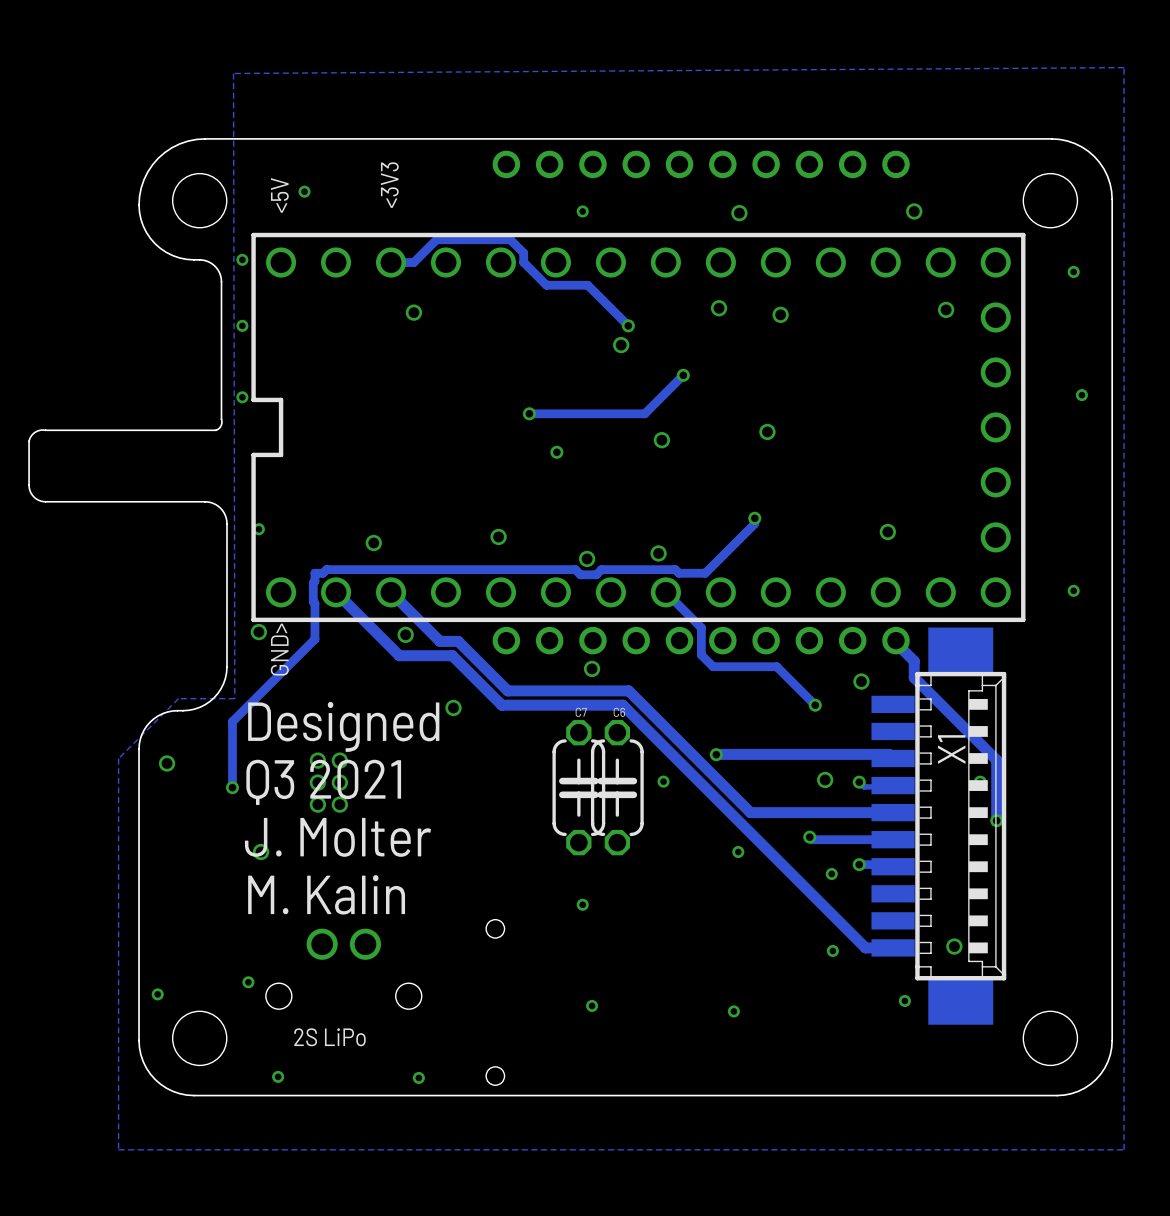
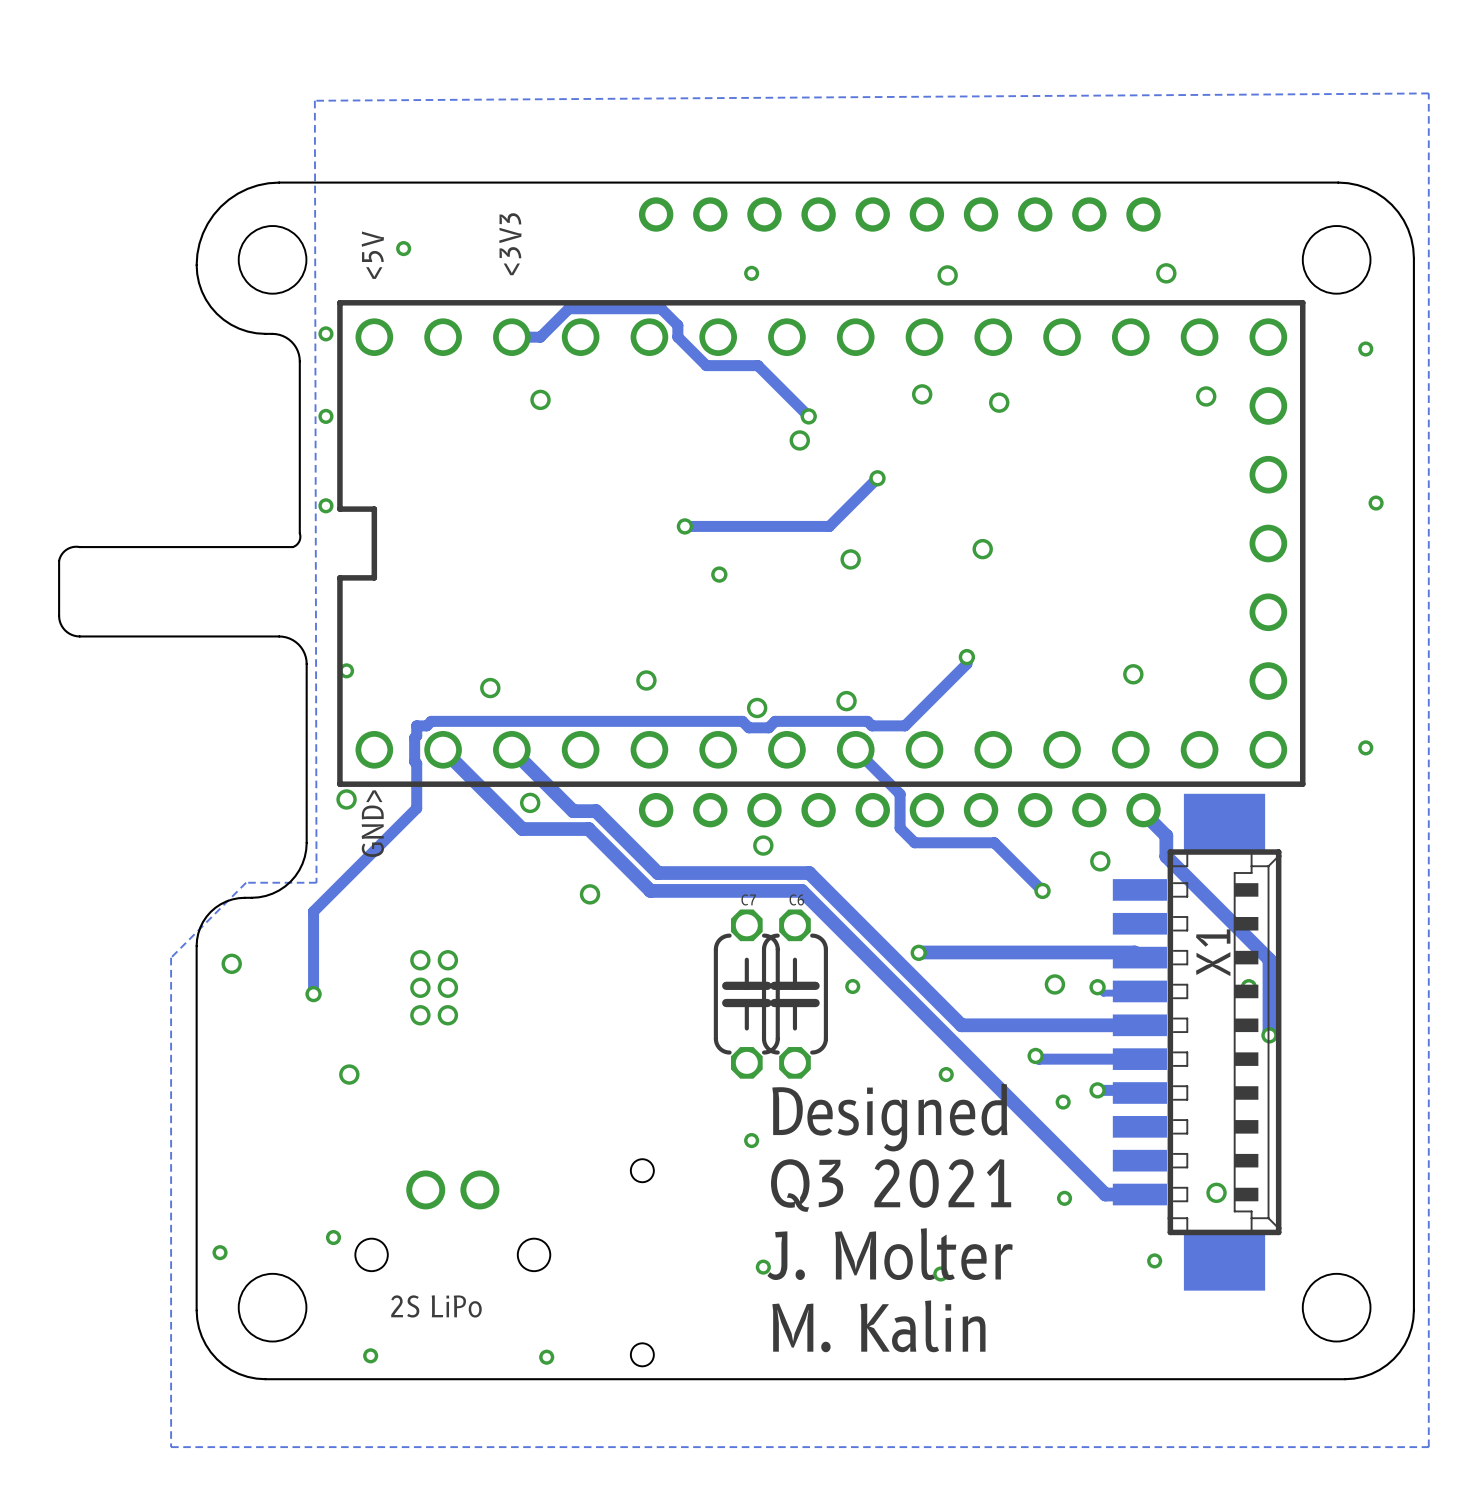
text position: Designed (343, 726) -> Designed (889, 1117)
text position: Q3 2021 (323, 782) -> Q3 2021 (891, 1185)
text position: J. Molter (337, 837) -> J. Molter (890, 1254)
text position: M. Kalin (326, 894) -> M. Kalin (878, 1326)

